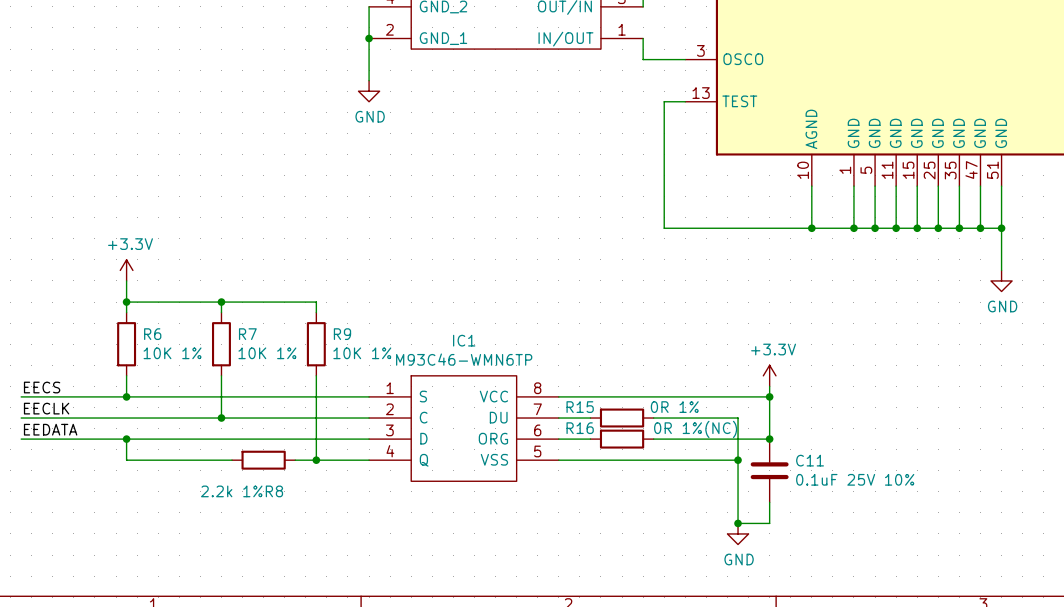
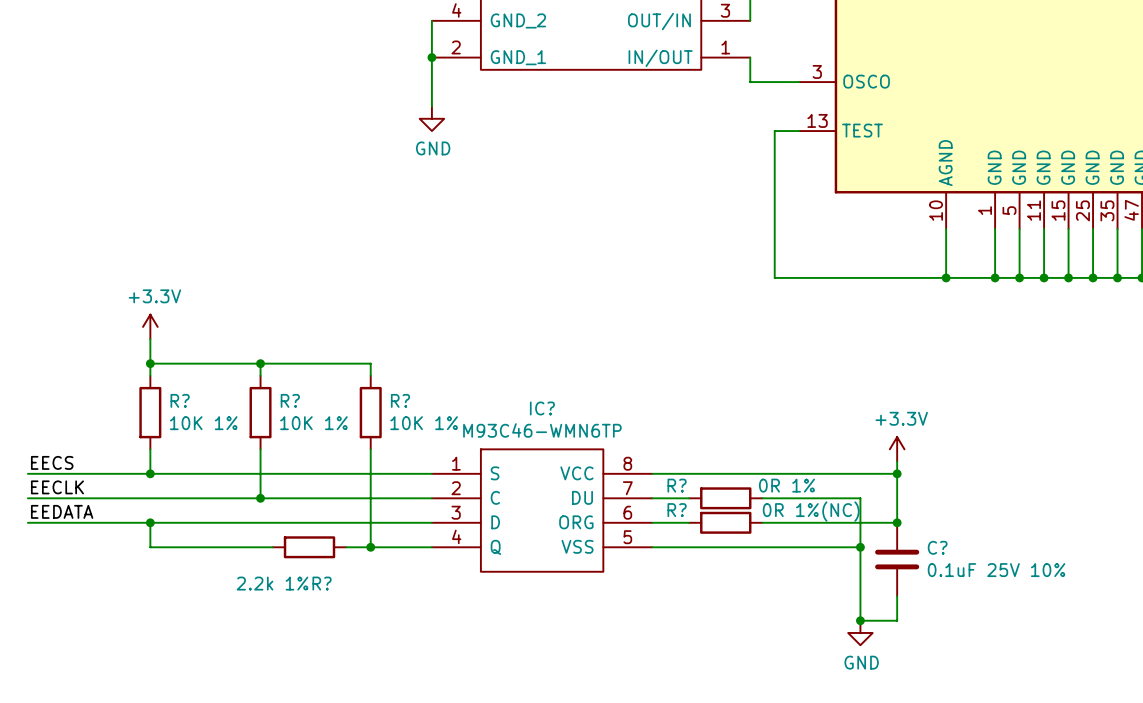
R6 name: R6 (152, 334) -> R? (180, 400)
R7 name: R7 (247, 334) -> R? (290, 400)
R9 name: R9 (342, 334) -> R? (400, 400)
IC1 name: IC1 (464, 340) -> IC? (542, 408)
R15 name: R15 (580, 407) -> R? (677, 485)
R16 name: R16 (580, 428) -> R? (677, 510)
C11 name: C11 (810, 460) -> C? (937, 547)
R8 name: R8 (274, 491) -> R? (322, 583)

